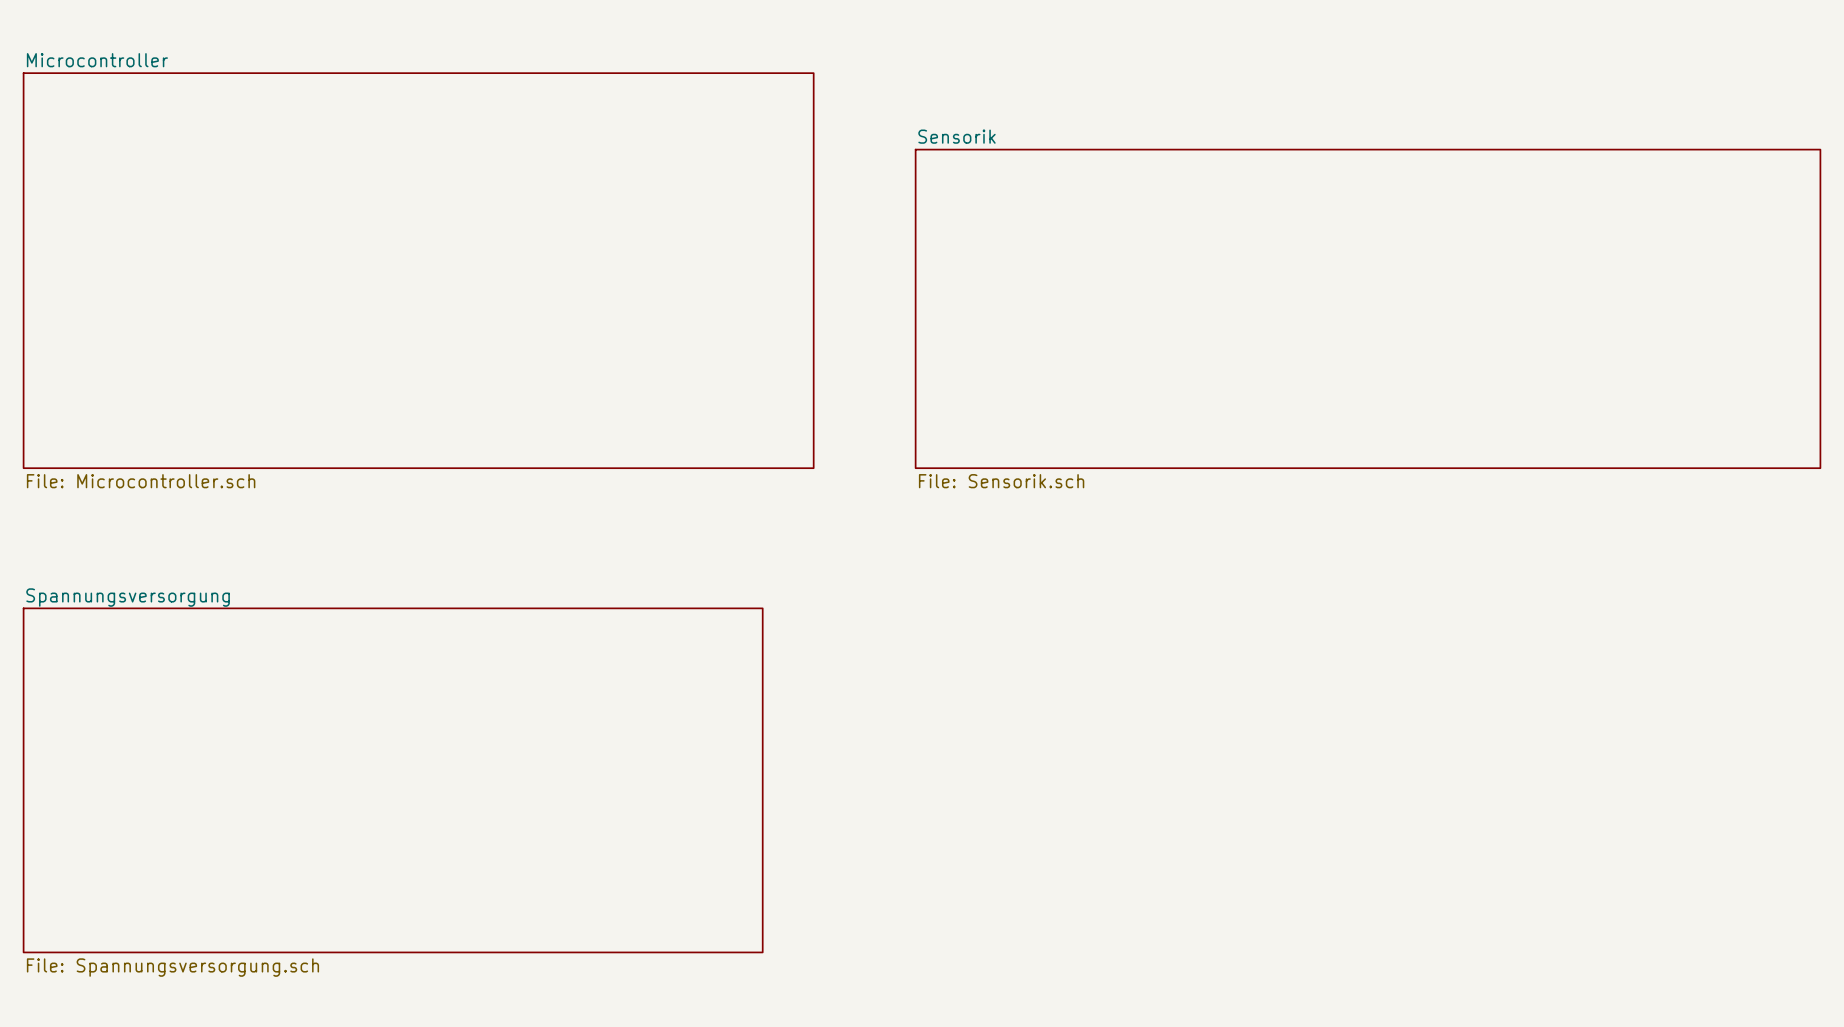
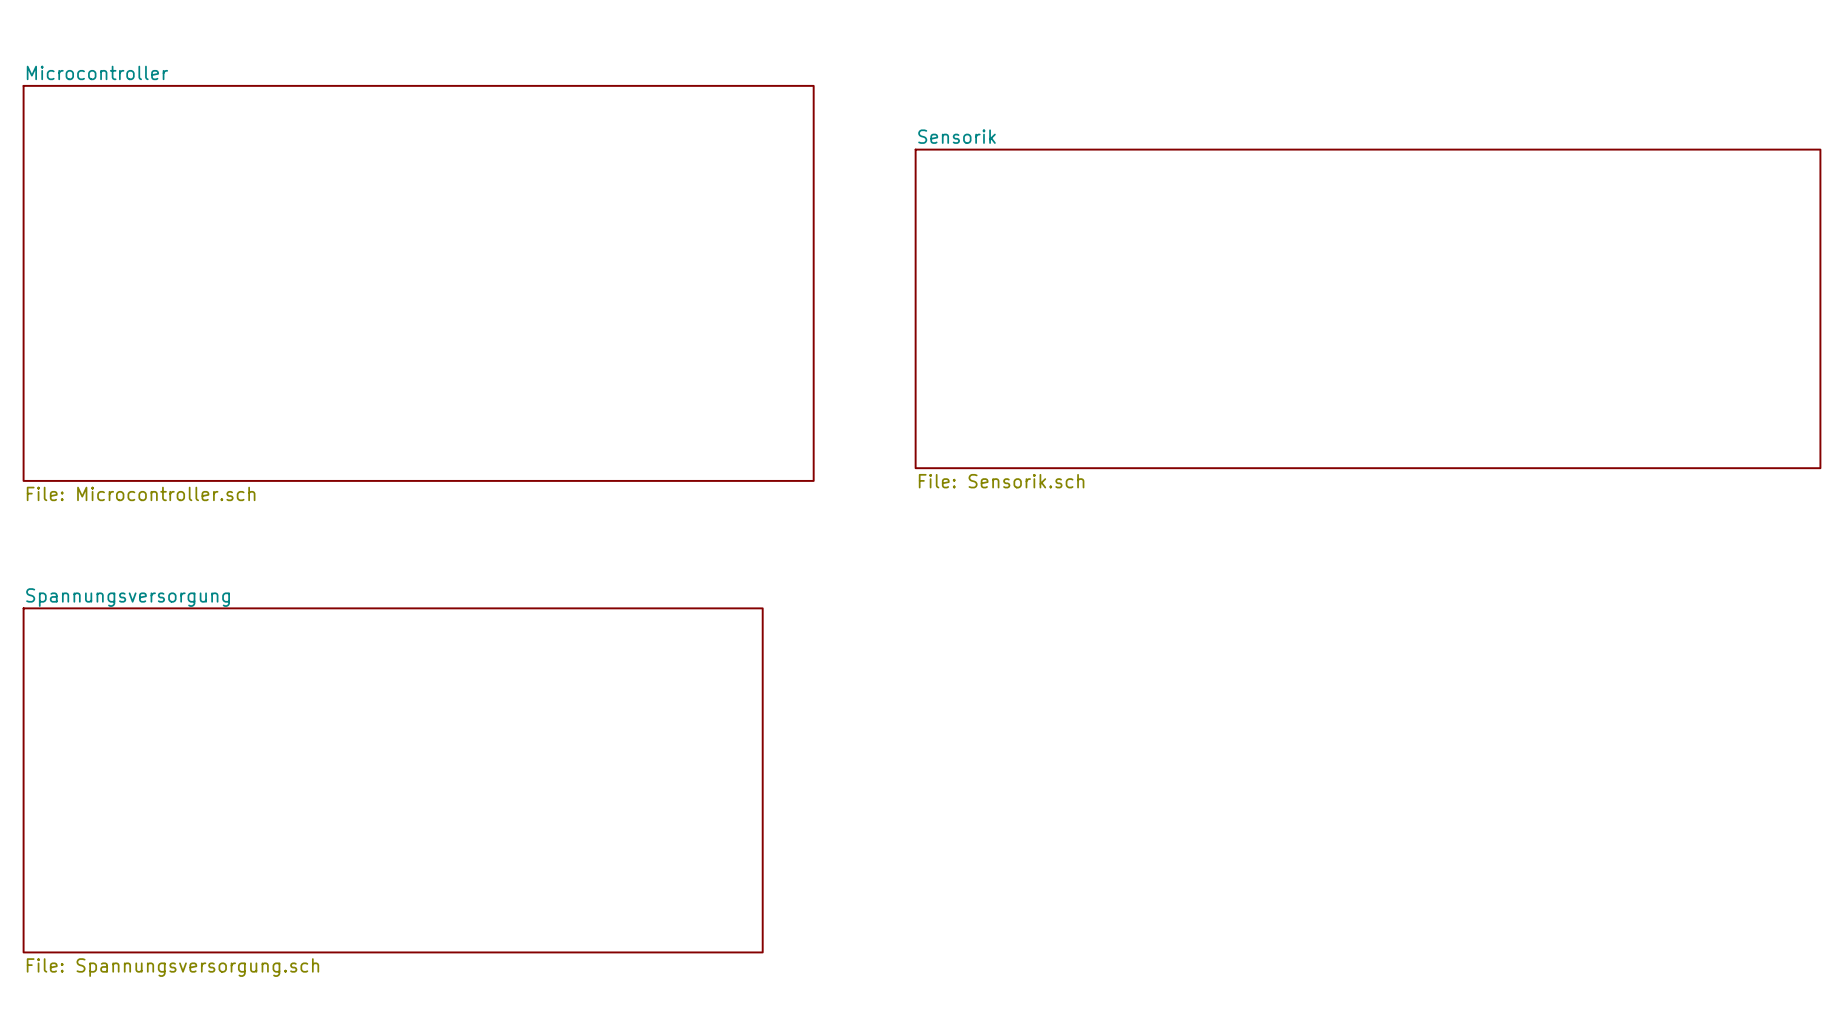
sheet Microcontroller position: (418, 270) -> (418, 283)

